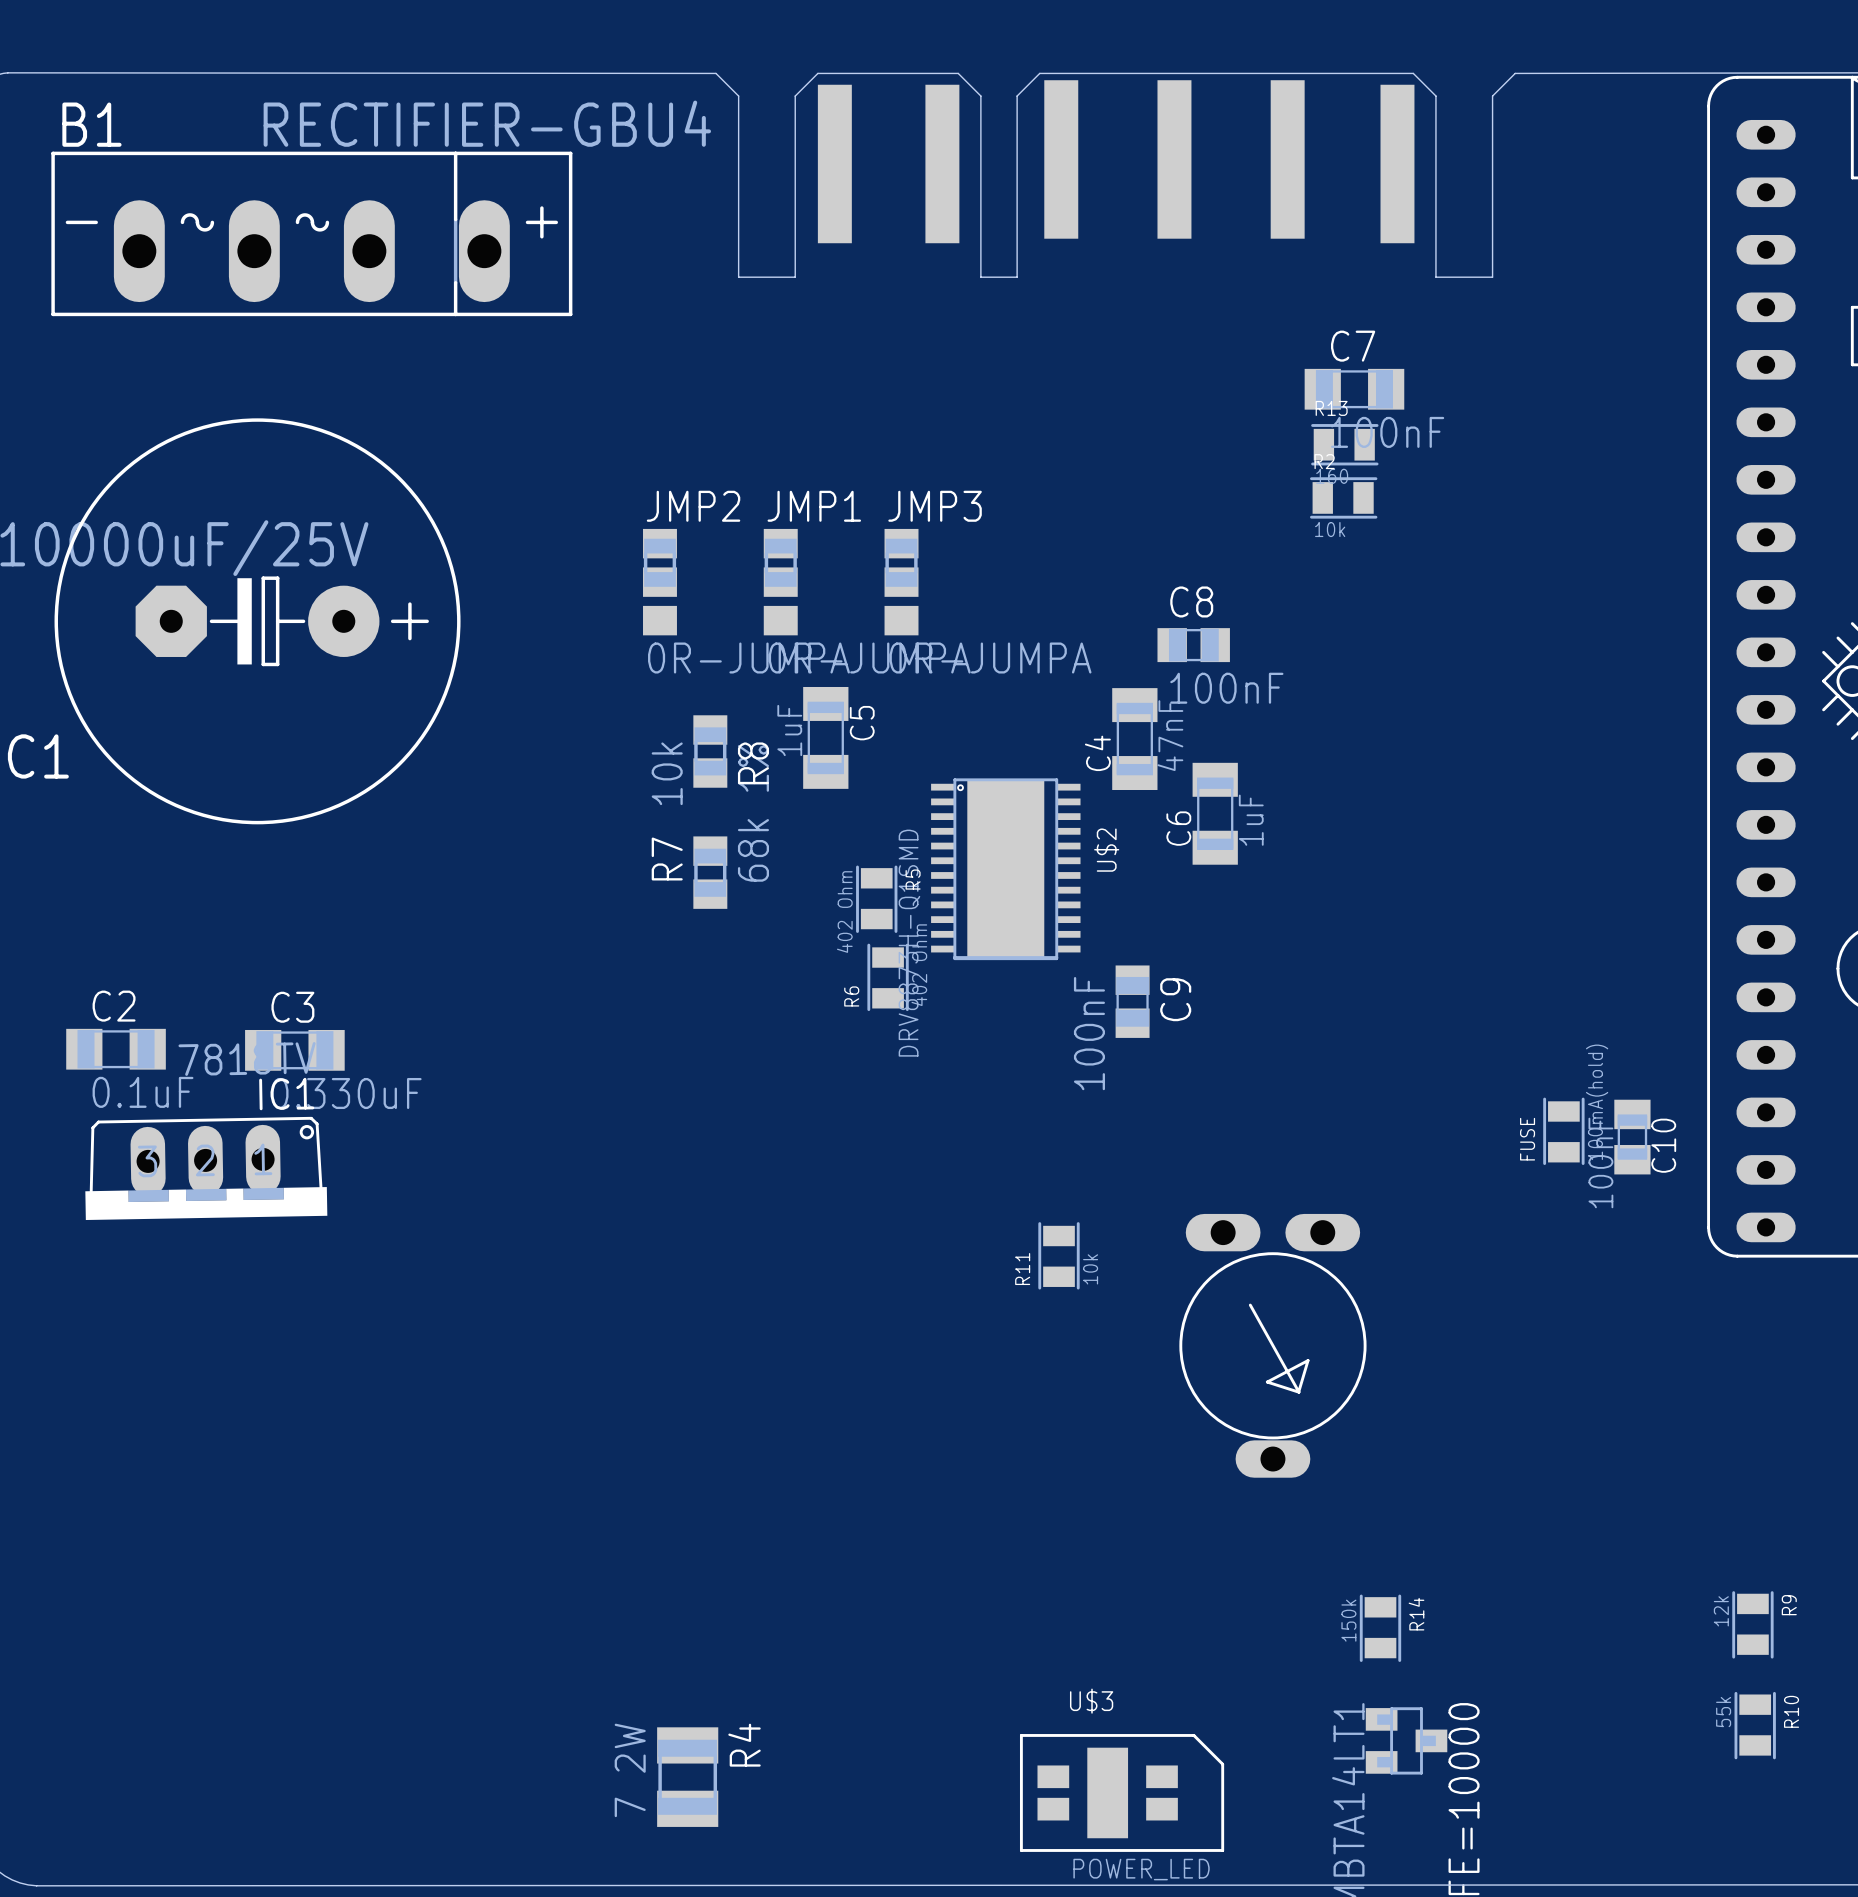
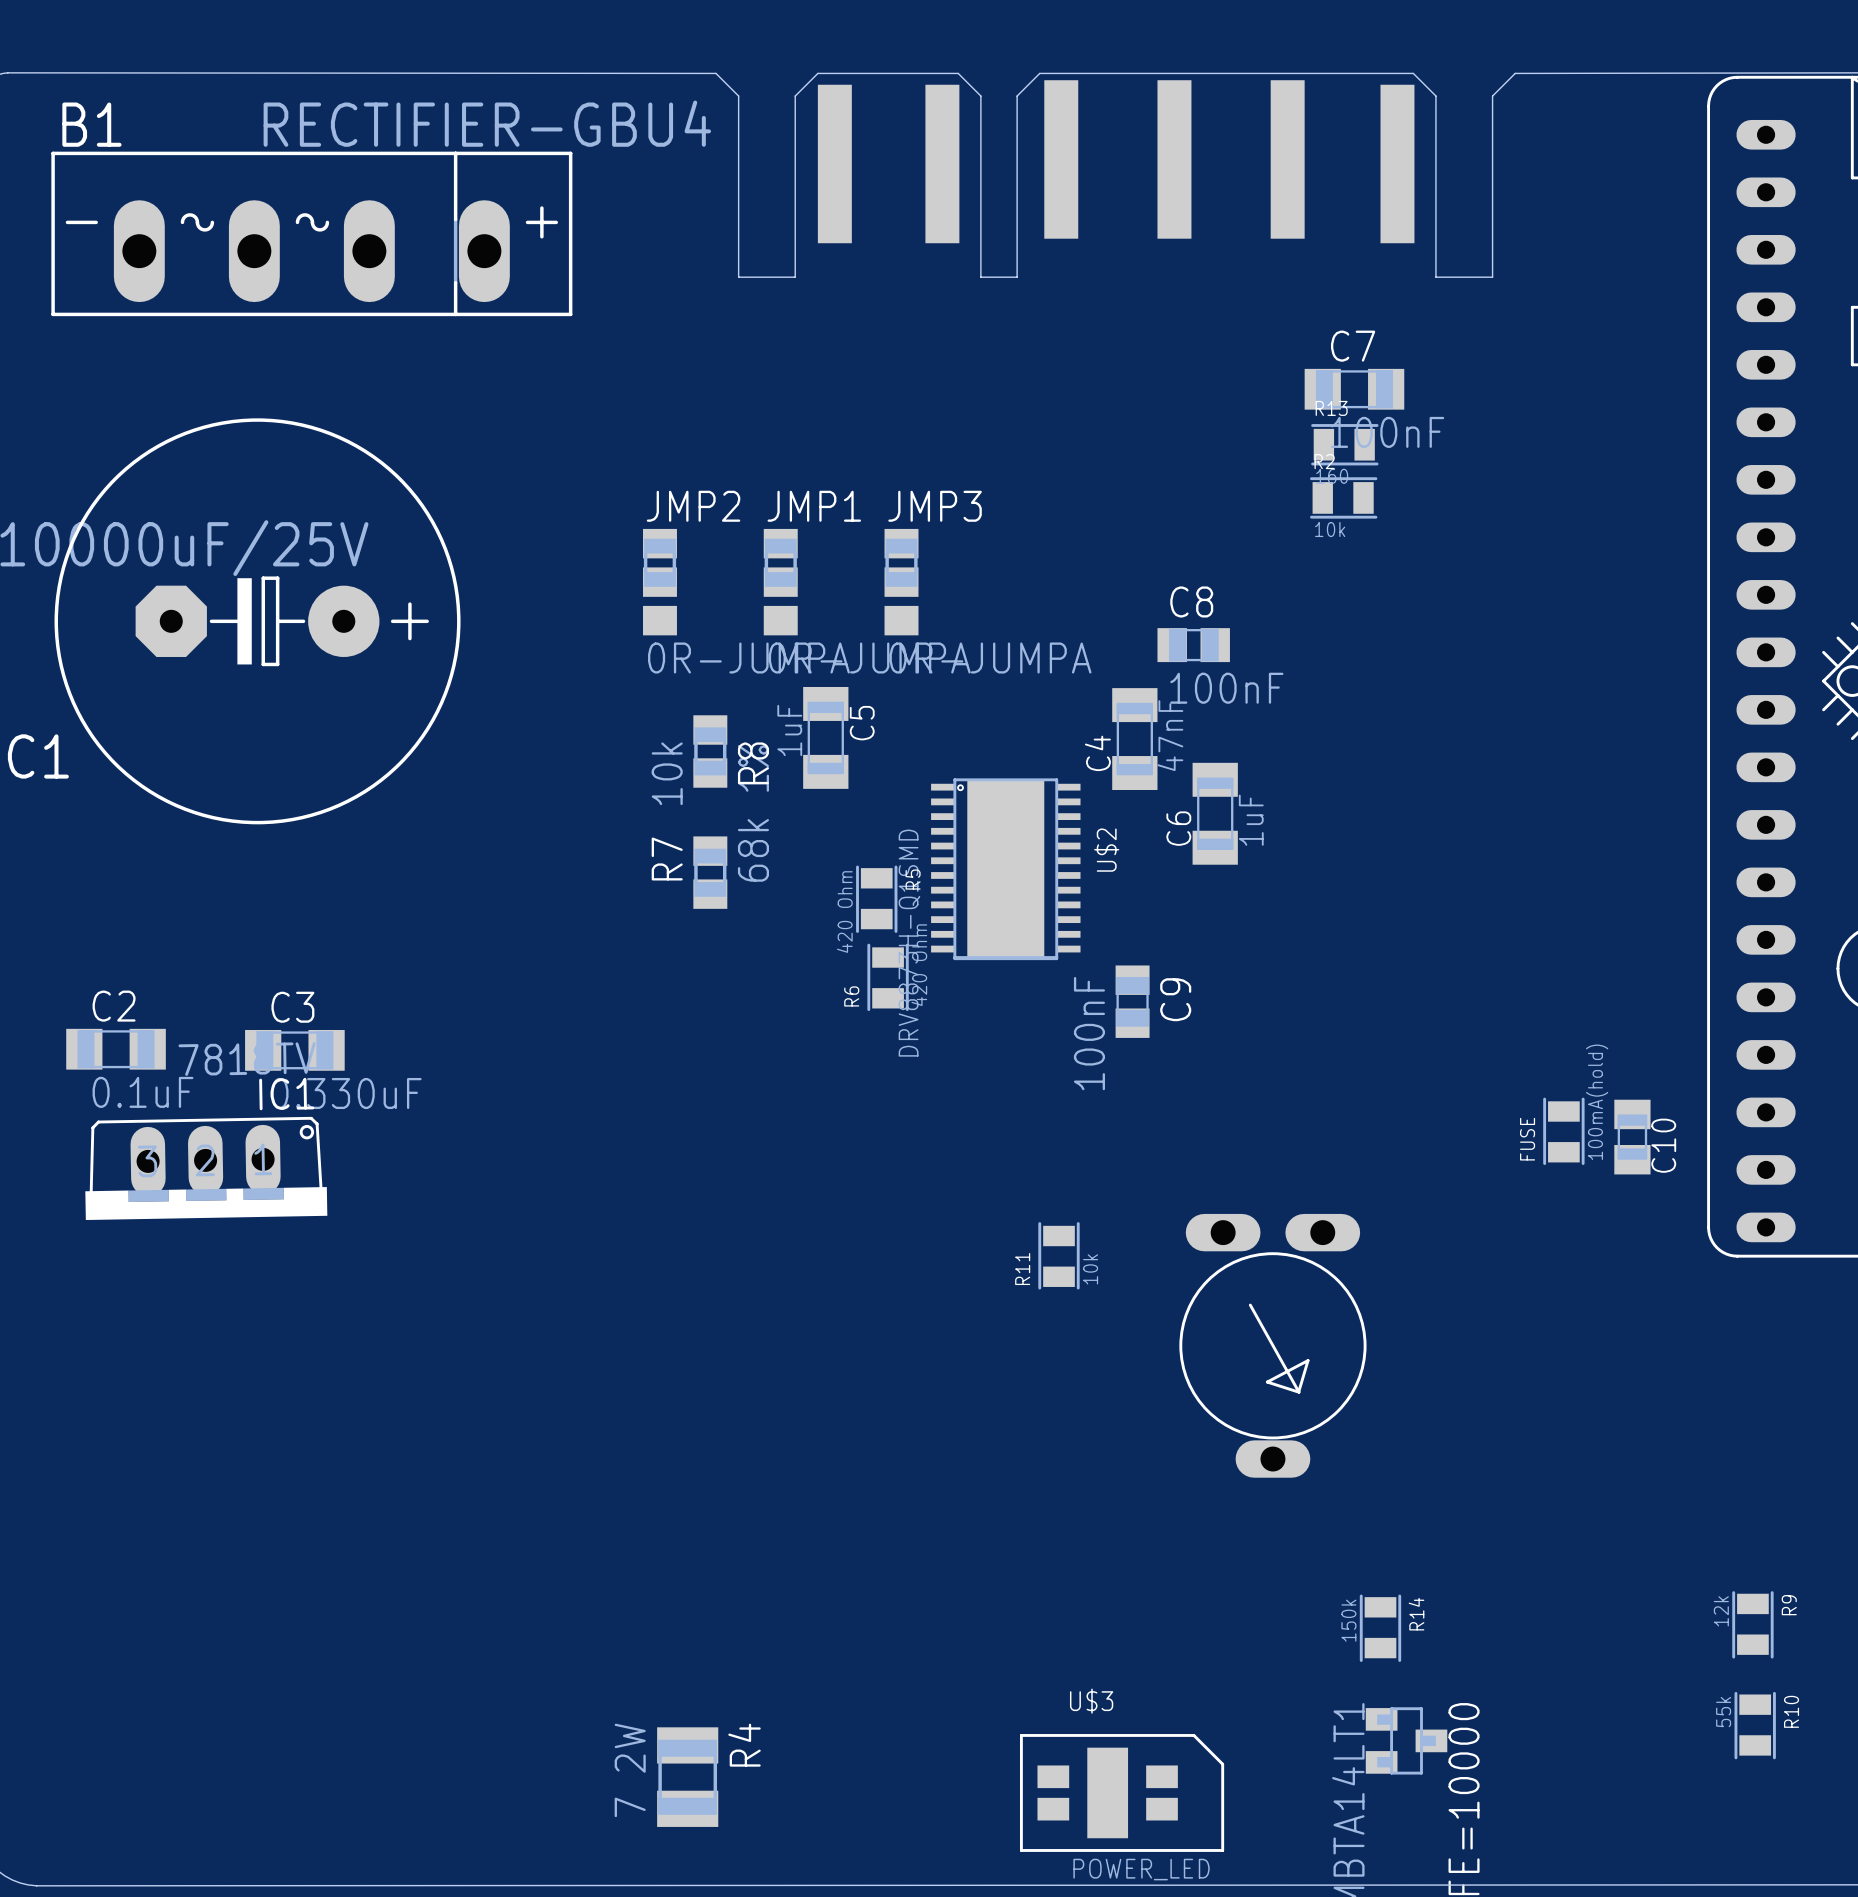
R5 value: 402 Ohm (844, 912) -> 420 Ohm (844, 912)
R6 value: 402 Ohm (919, 965) -> 420 Ohm (919, 965)
C10 value: 100nF (1600, 1162) -> none

